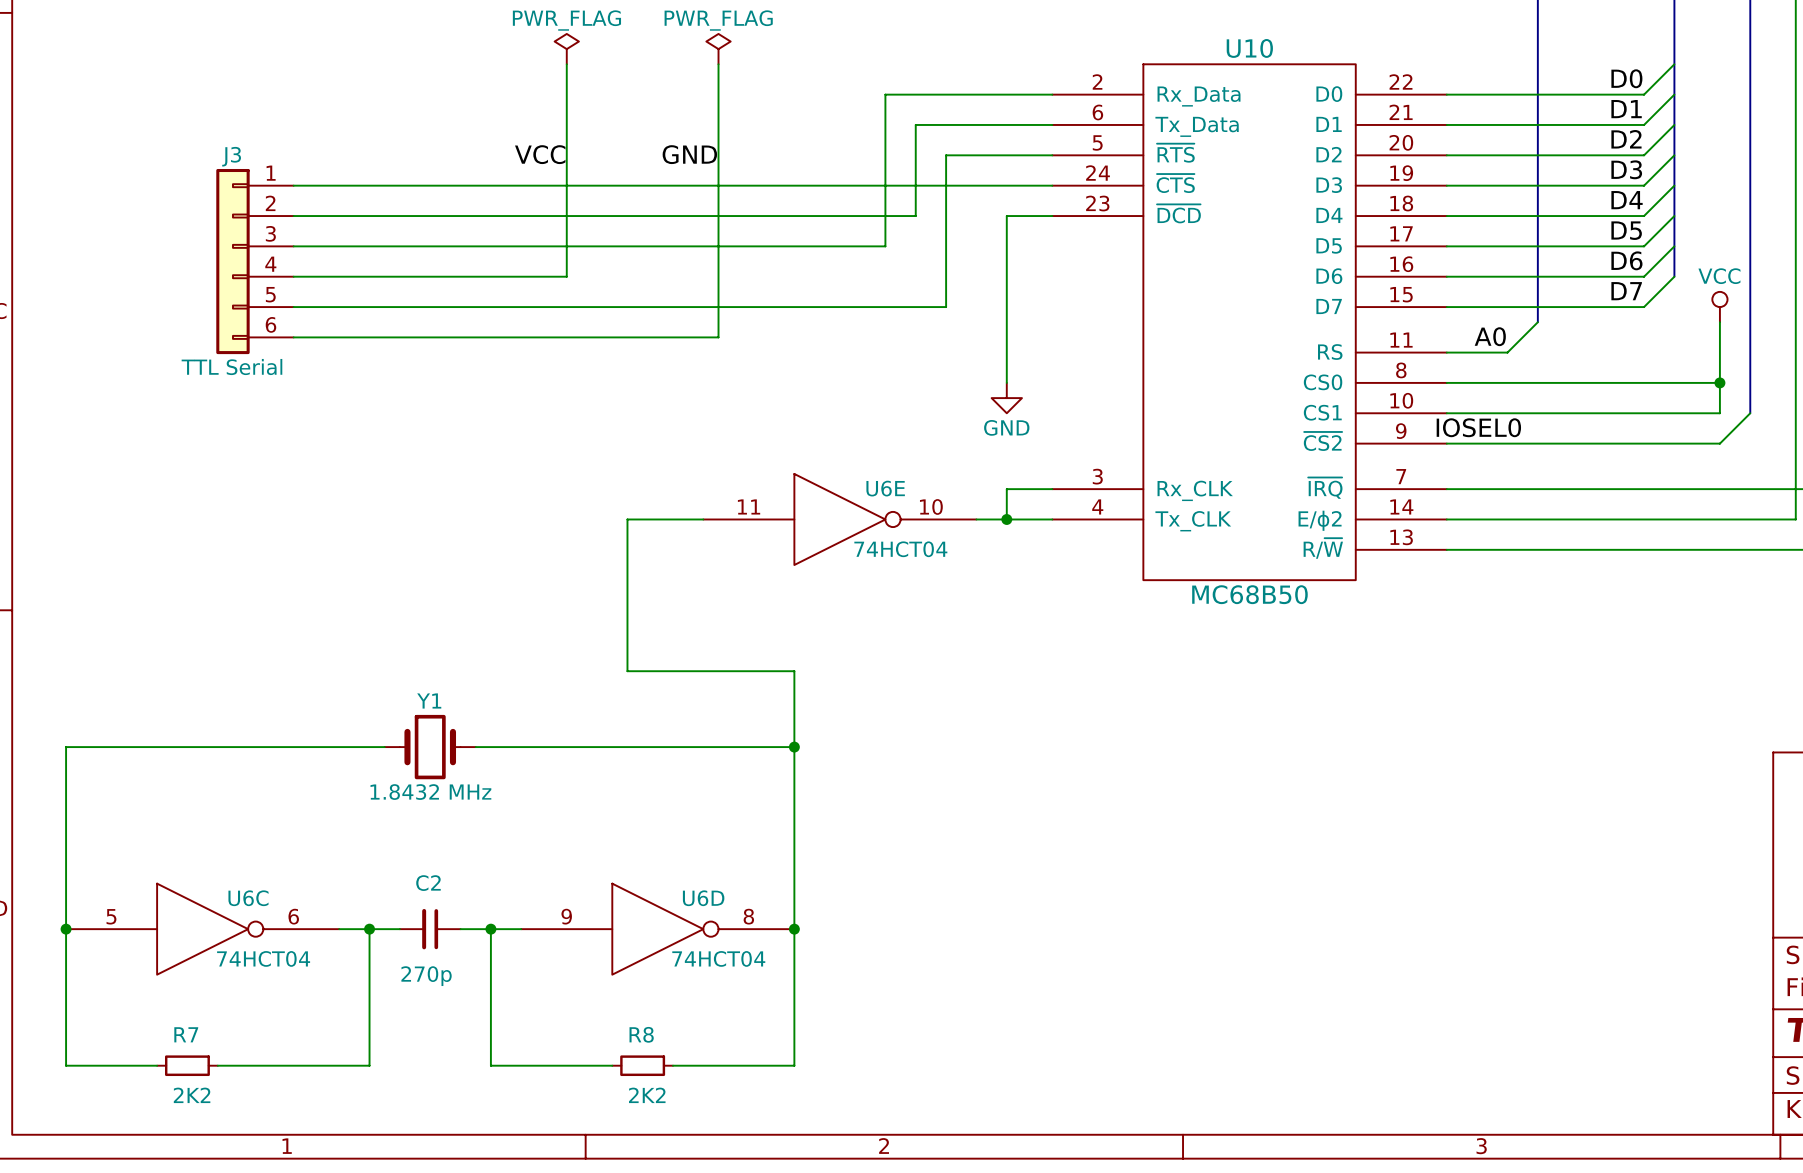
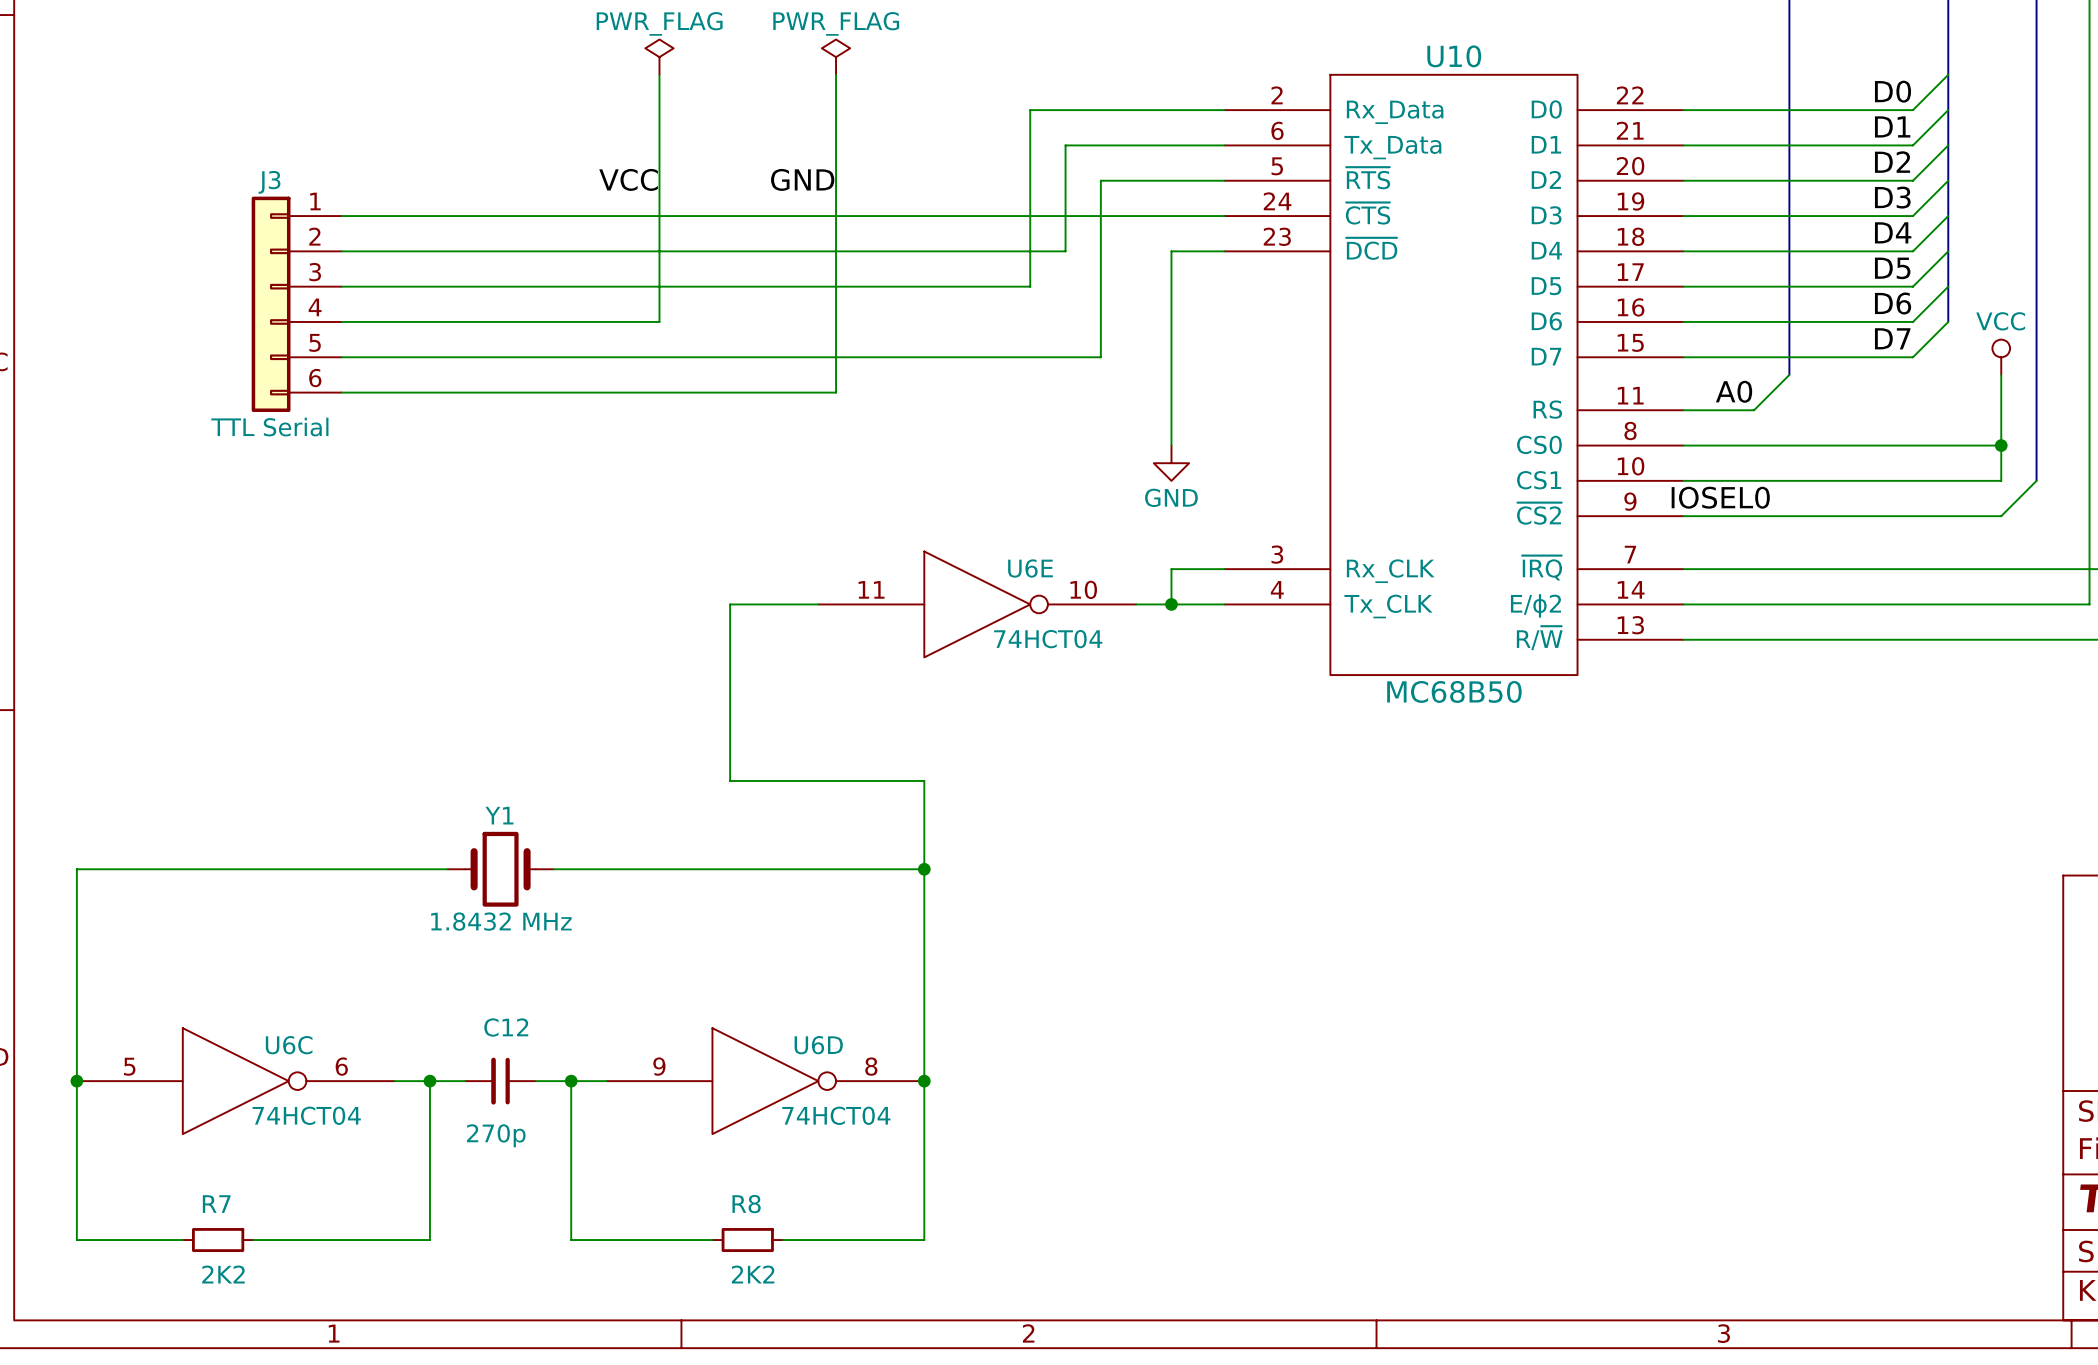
C2 name: C2 (428, 883) -> C12 (506, 1027)

